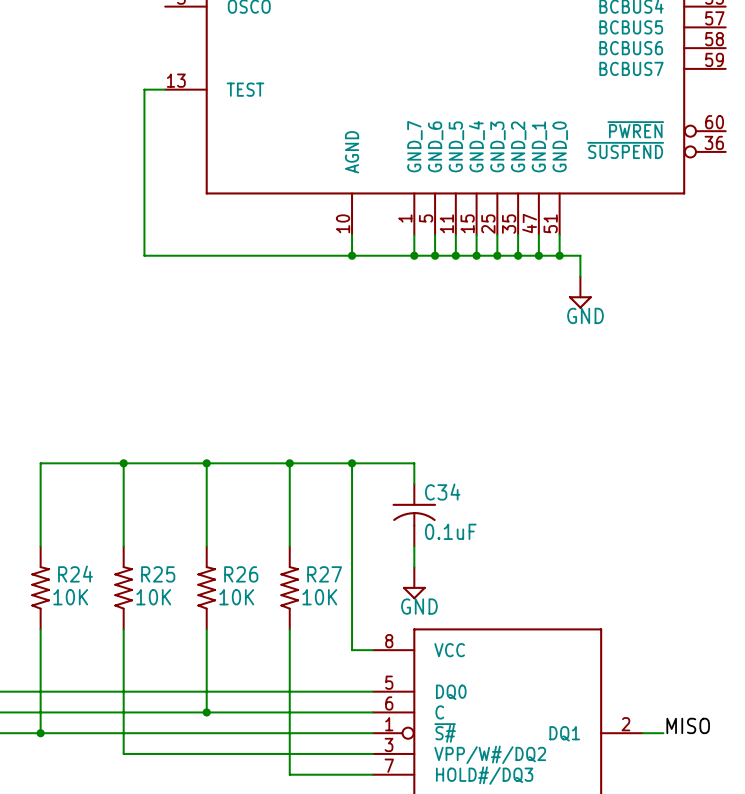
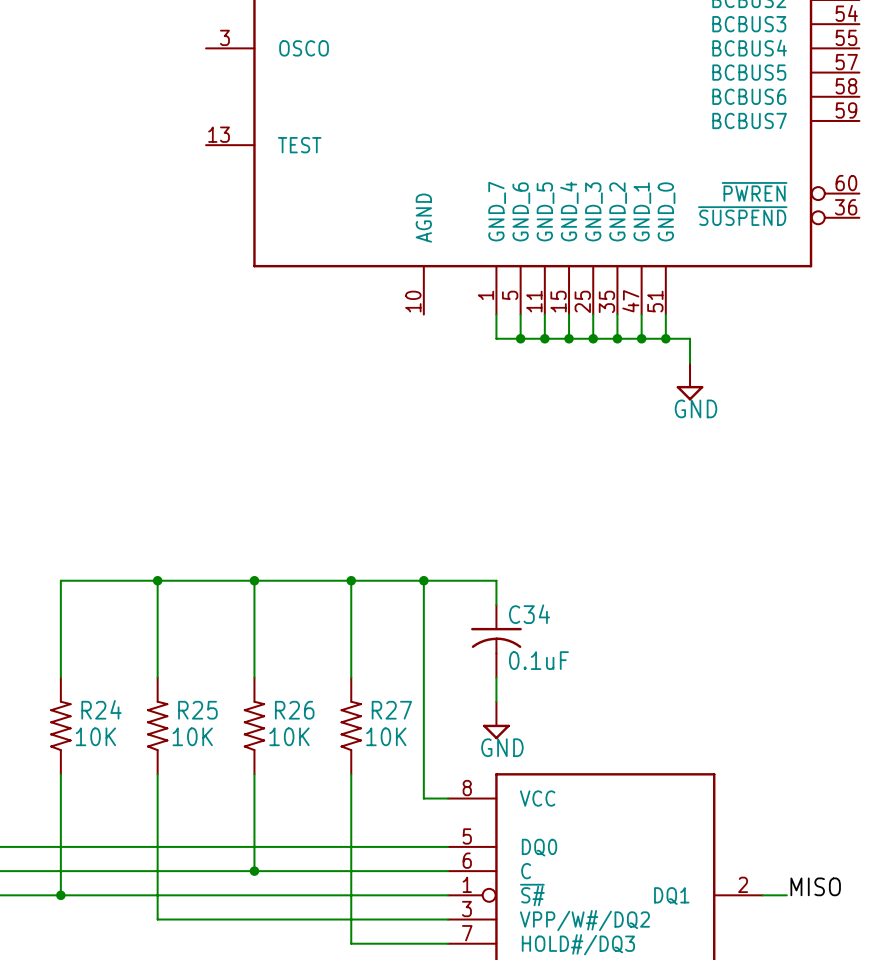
wire: (165, 89) (144, 89) (144, 255) (414, 255) -> none
wire: (352, 234) (352, 255) -> none
junction: (352, 255) -> none
junction: (414, 255) -> none

